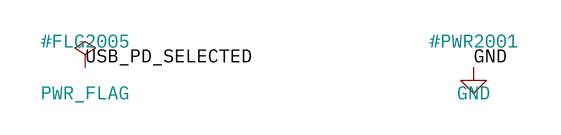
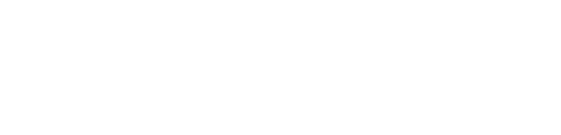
#FLG2005: PWR_FLAG (85, 54) -> none
label: GND (490, 55) -> none
label: USB_PD_SELECTED (168, 57) -> none
#PWR2001: GND (473, 80) -> none

